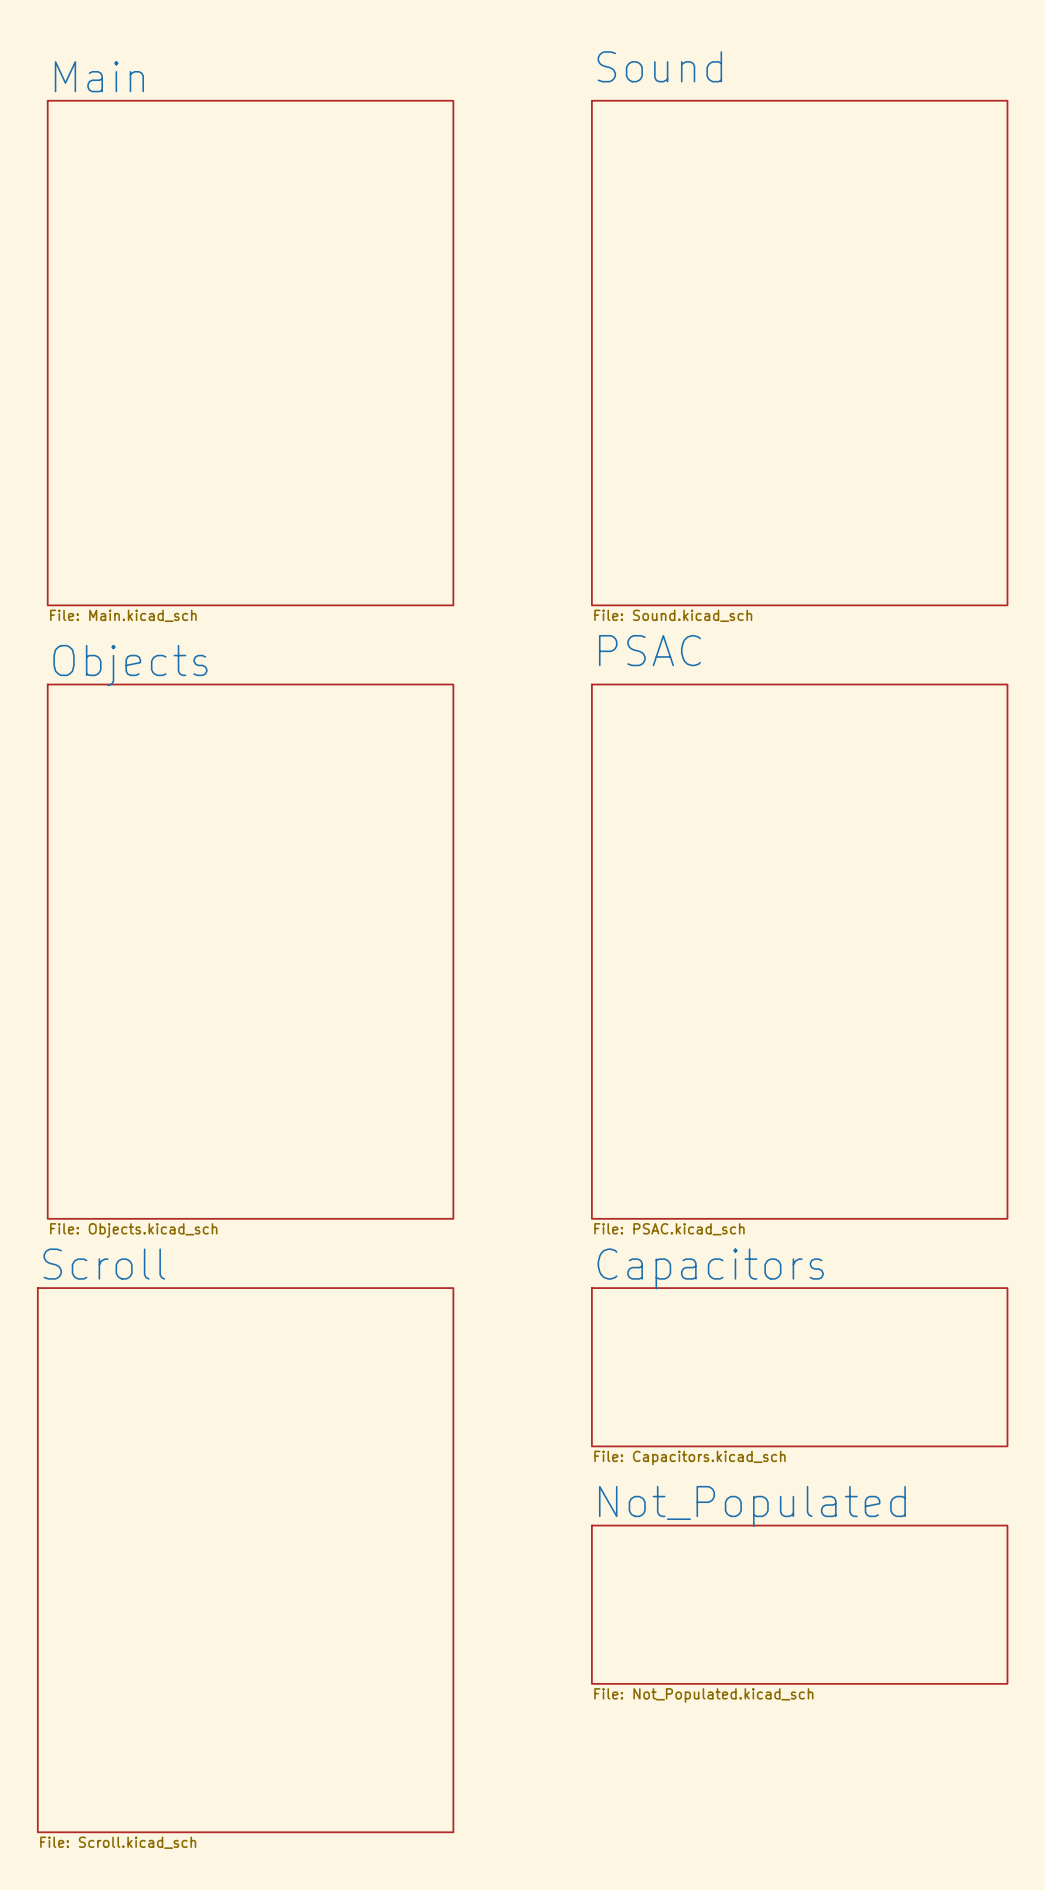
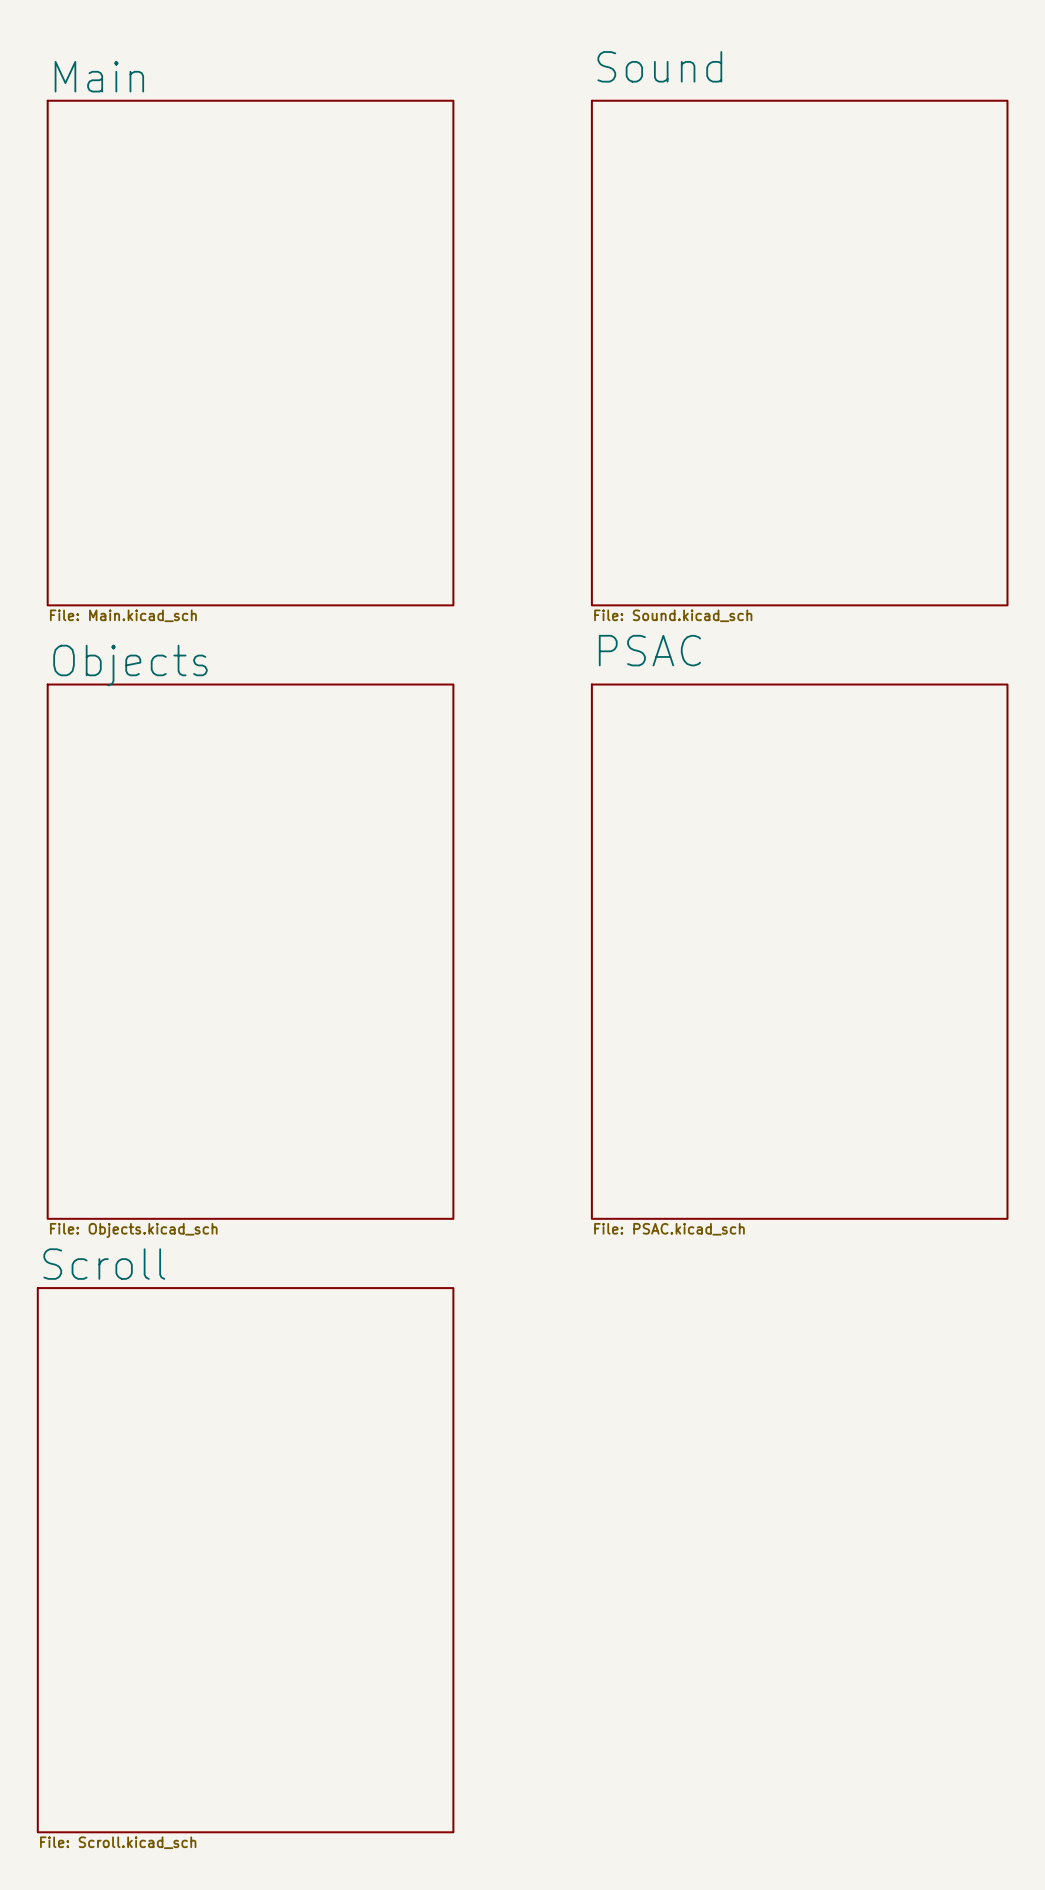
sheet Capacitors: File: Capacitors.kicad_sch (799, 1367) -> none
sheet Not_Populated: File: Not_Populated.kicad_sch (799, 1604) -> none

